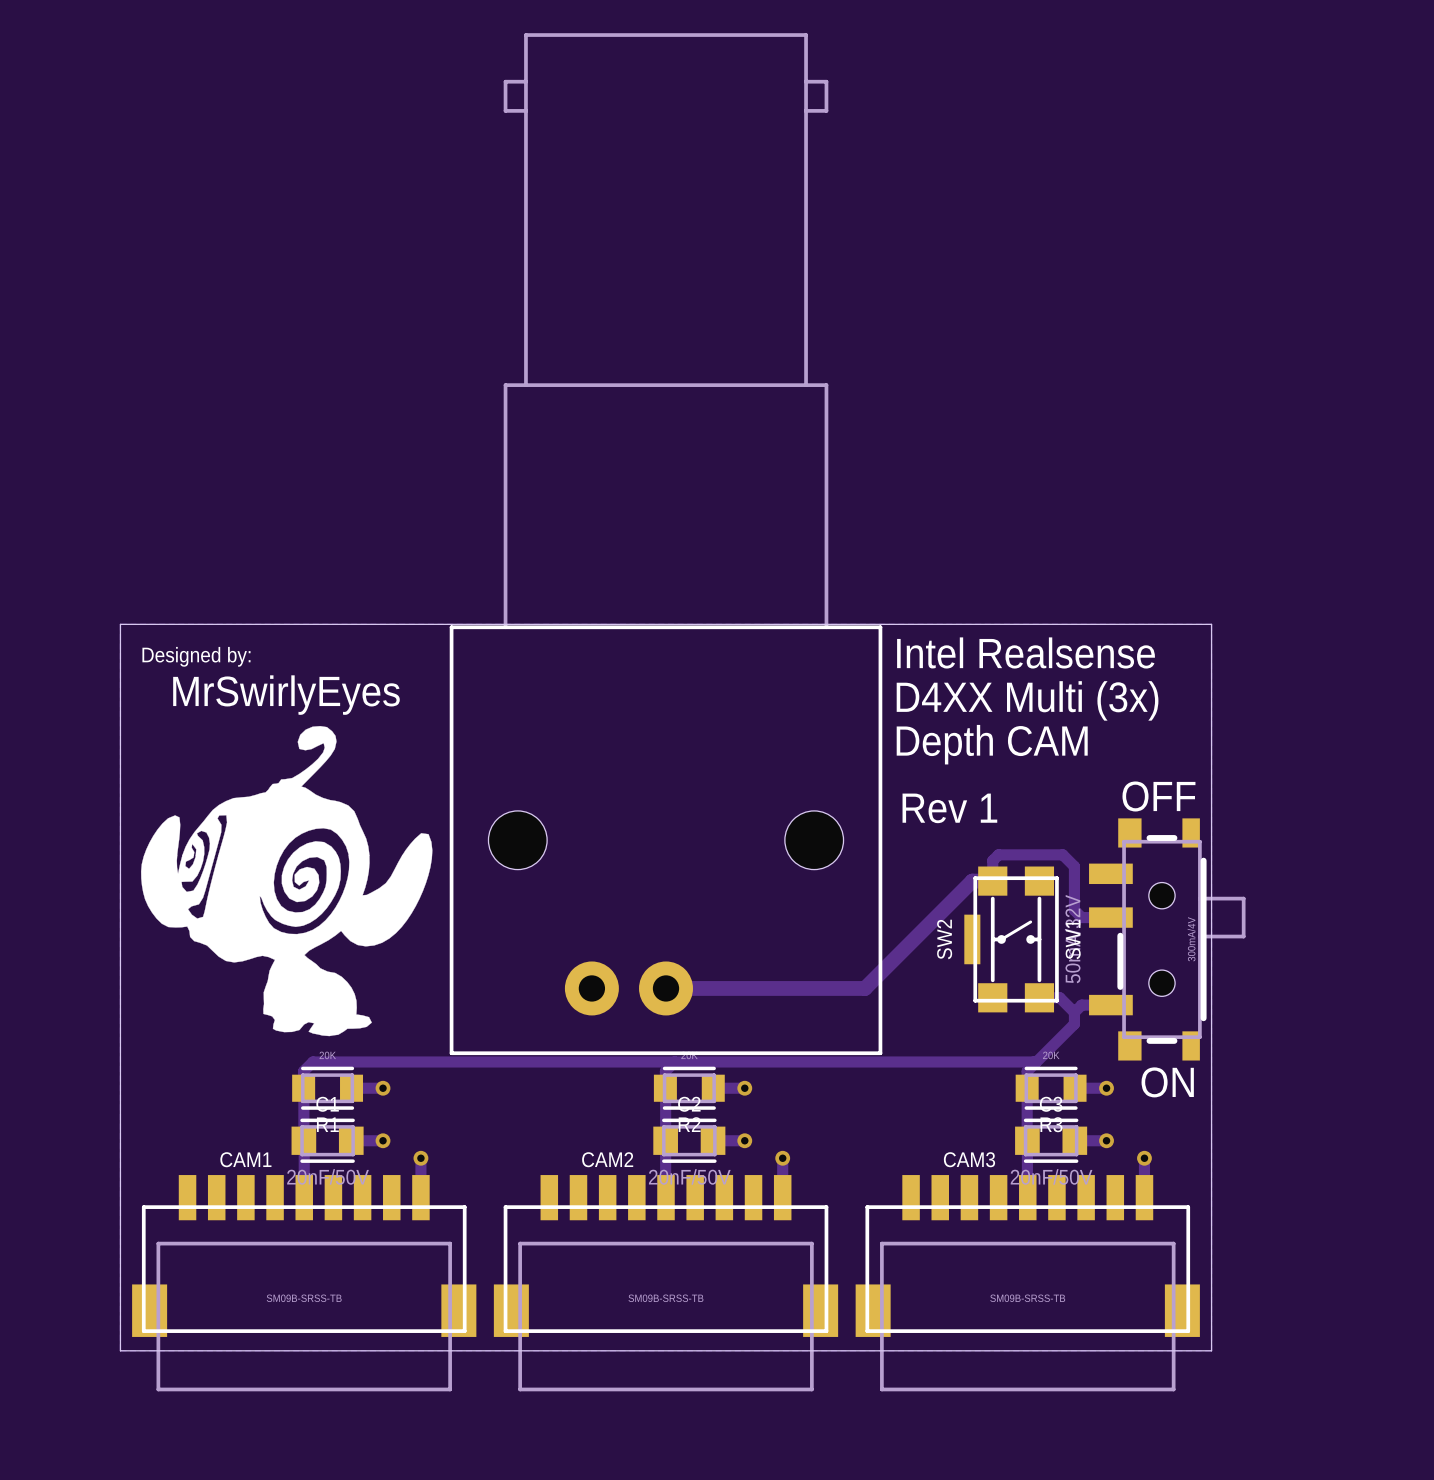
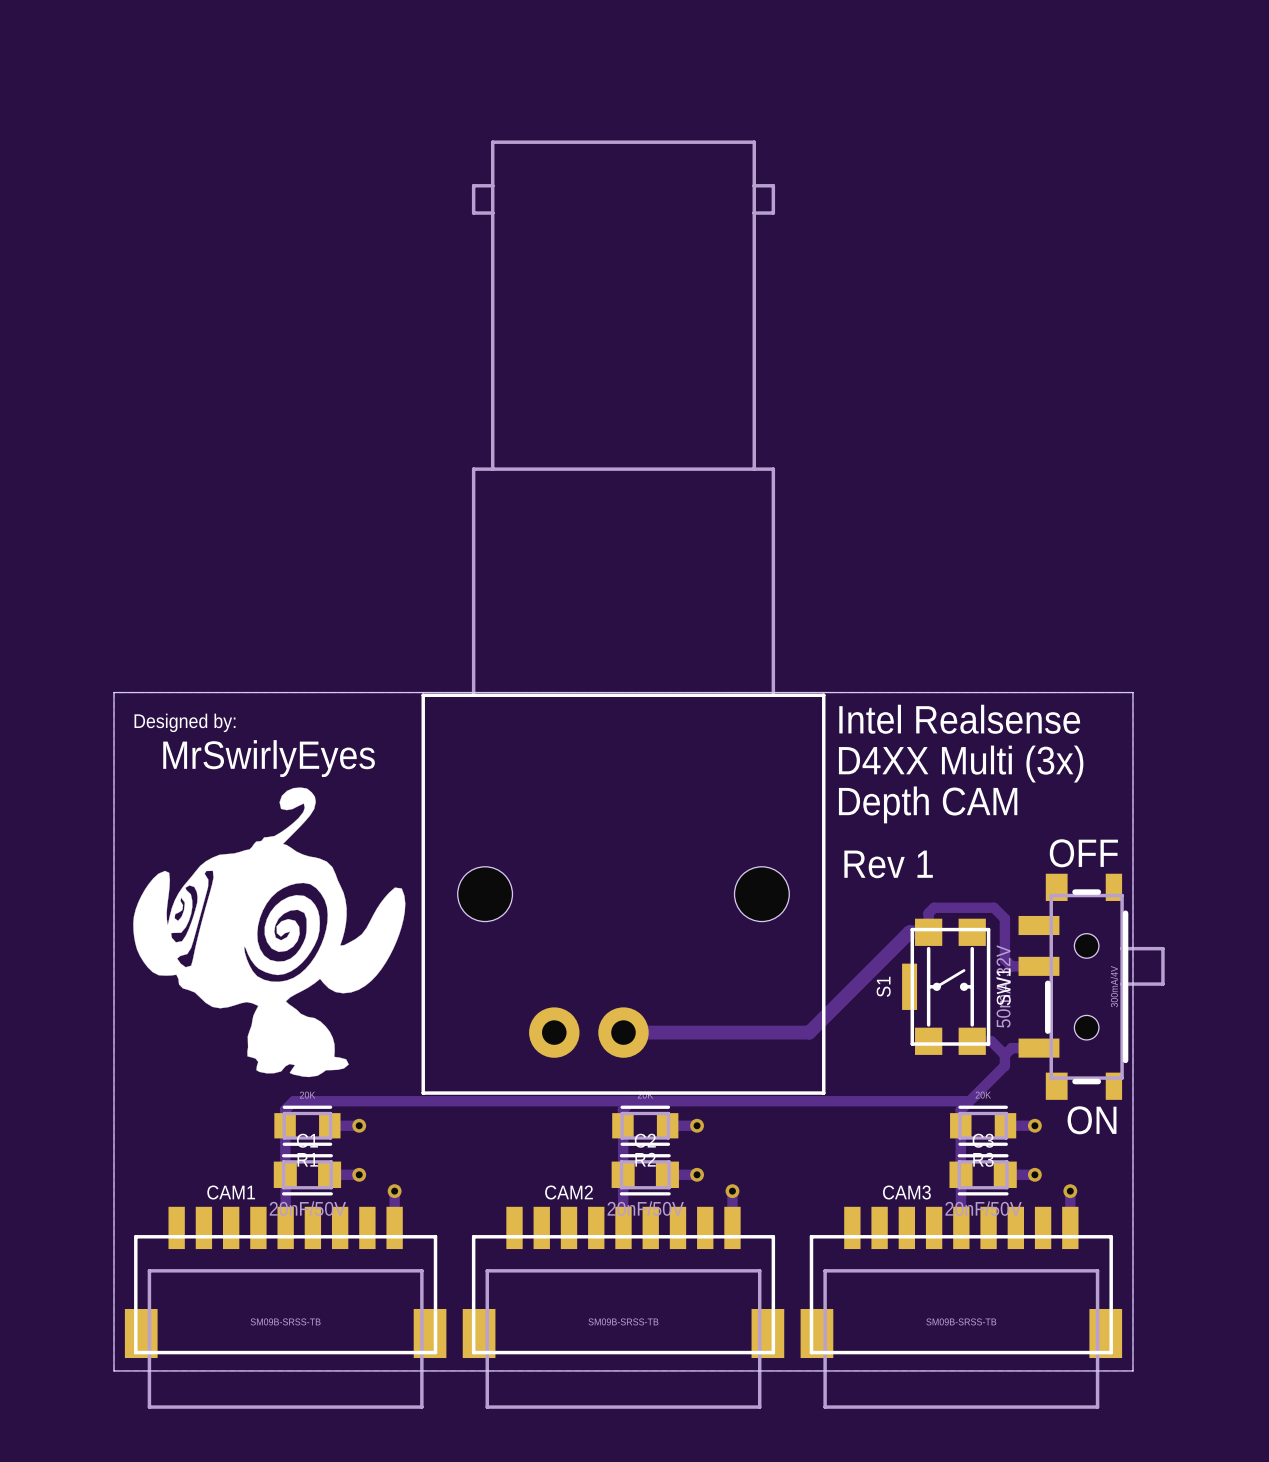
SW2 name: SW2 (944, 939) -> S1 (883, 986)

